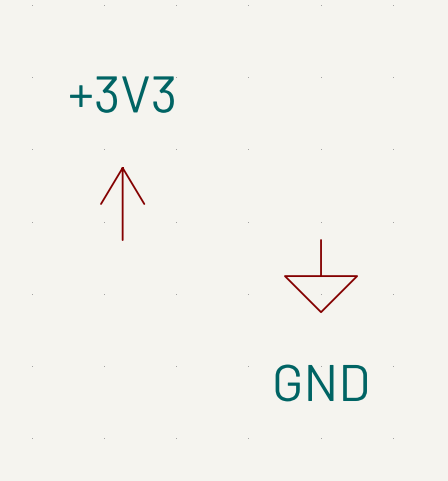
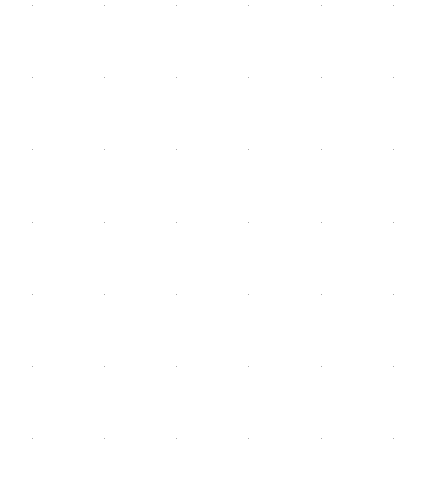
power symbol: +3V3 (122, 203) -> none
power symbol: GND (321, 276) -> none

